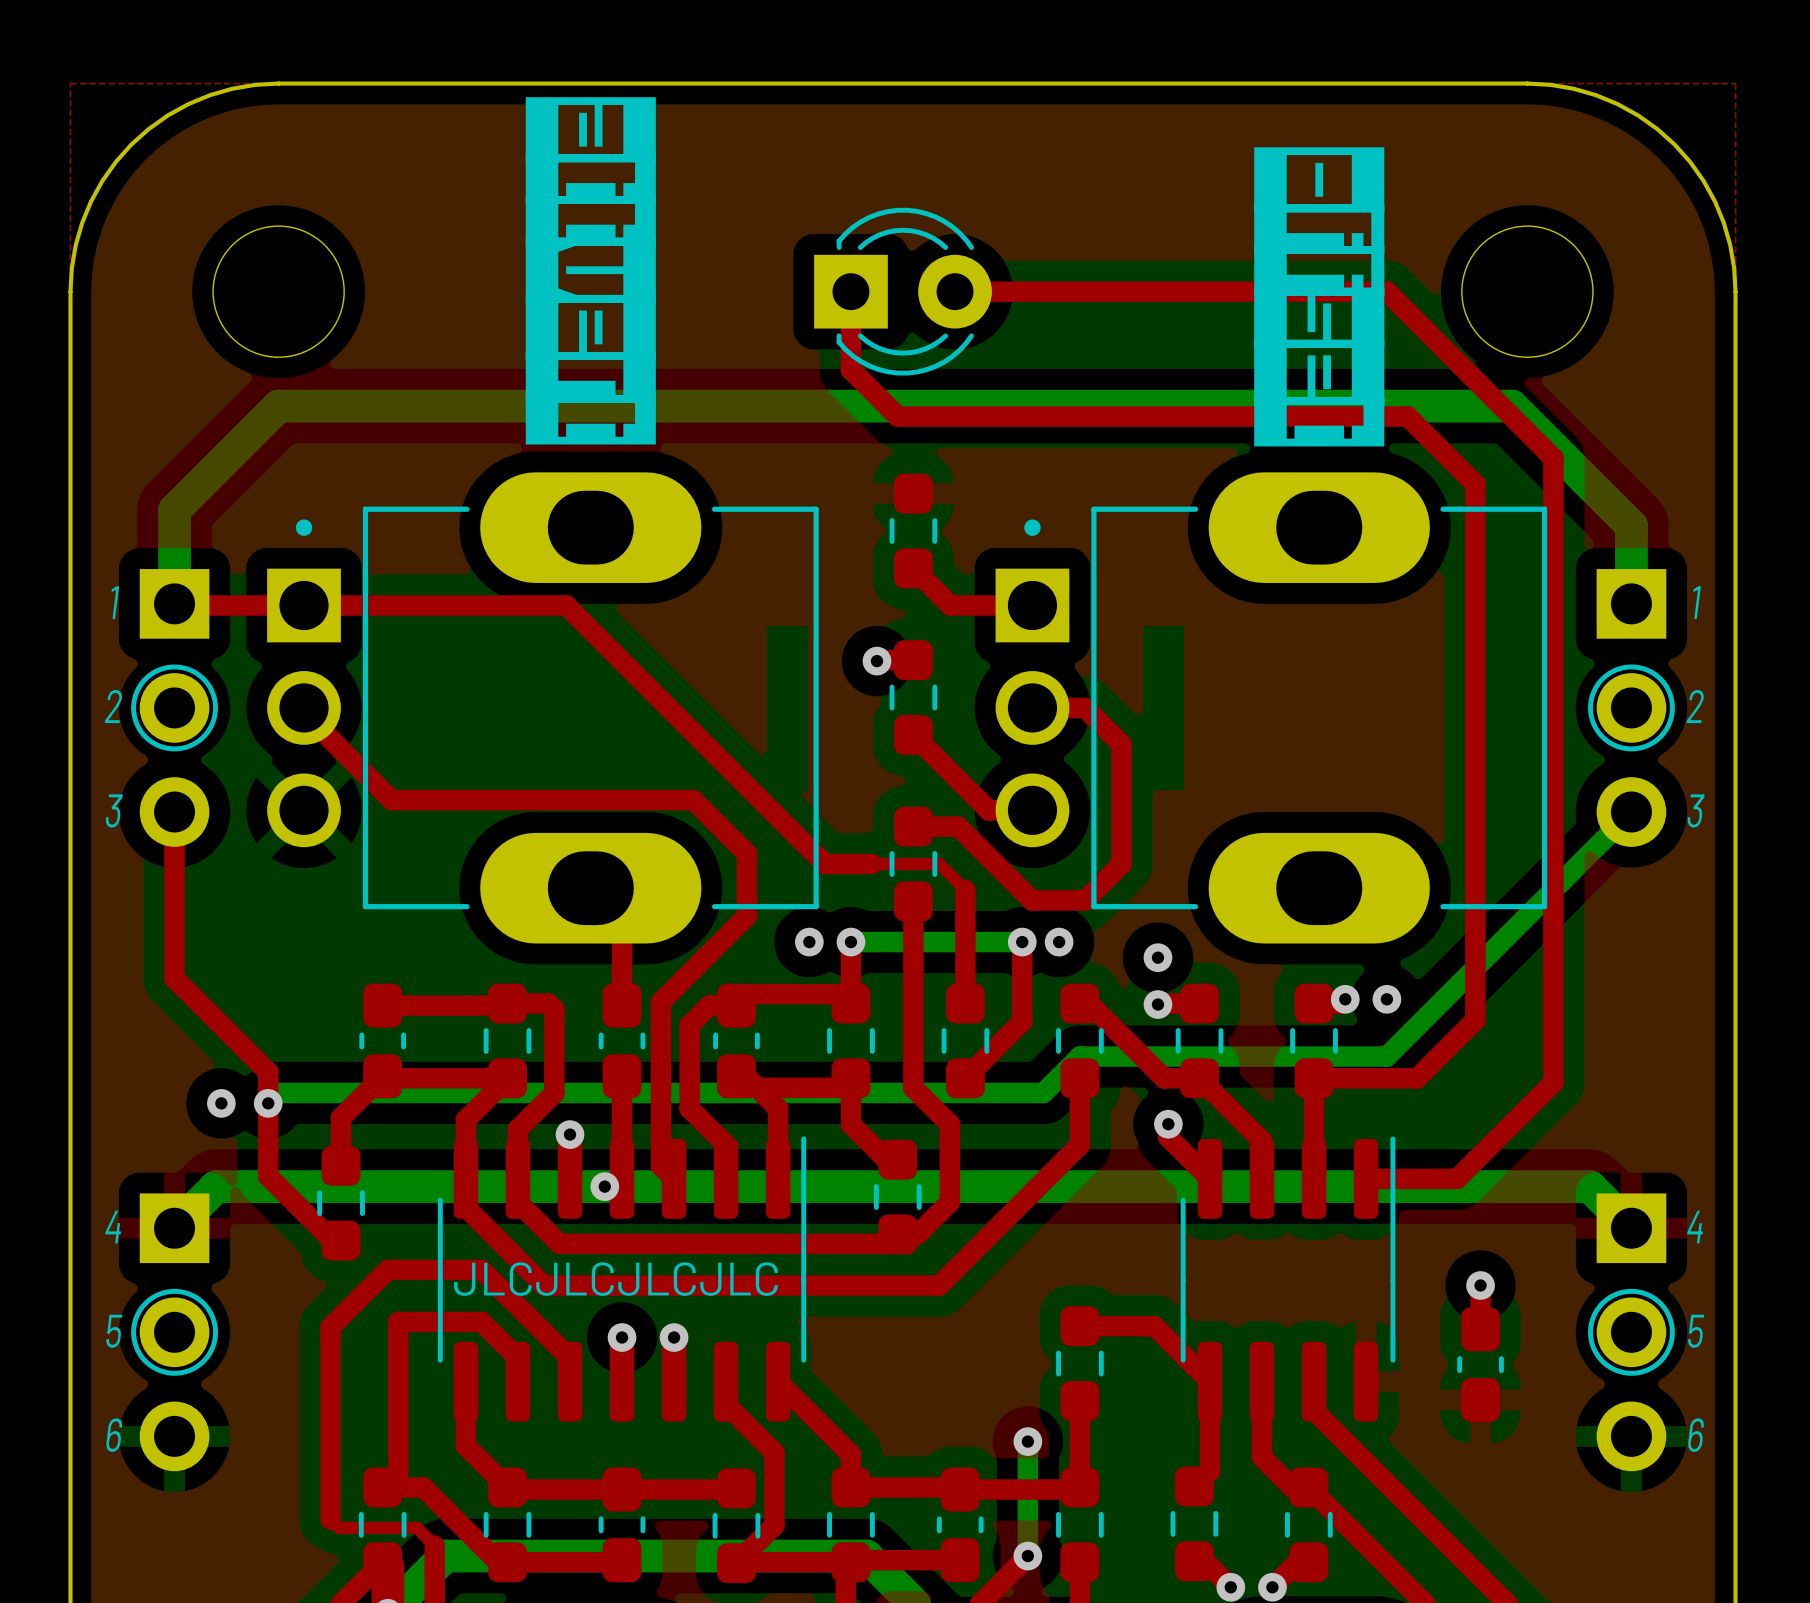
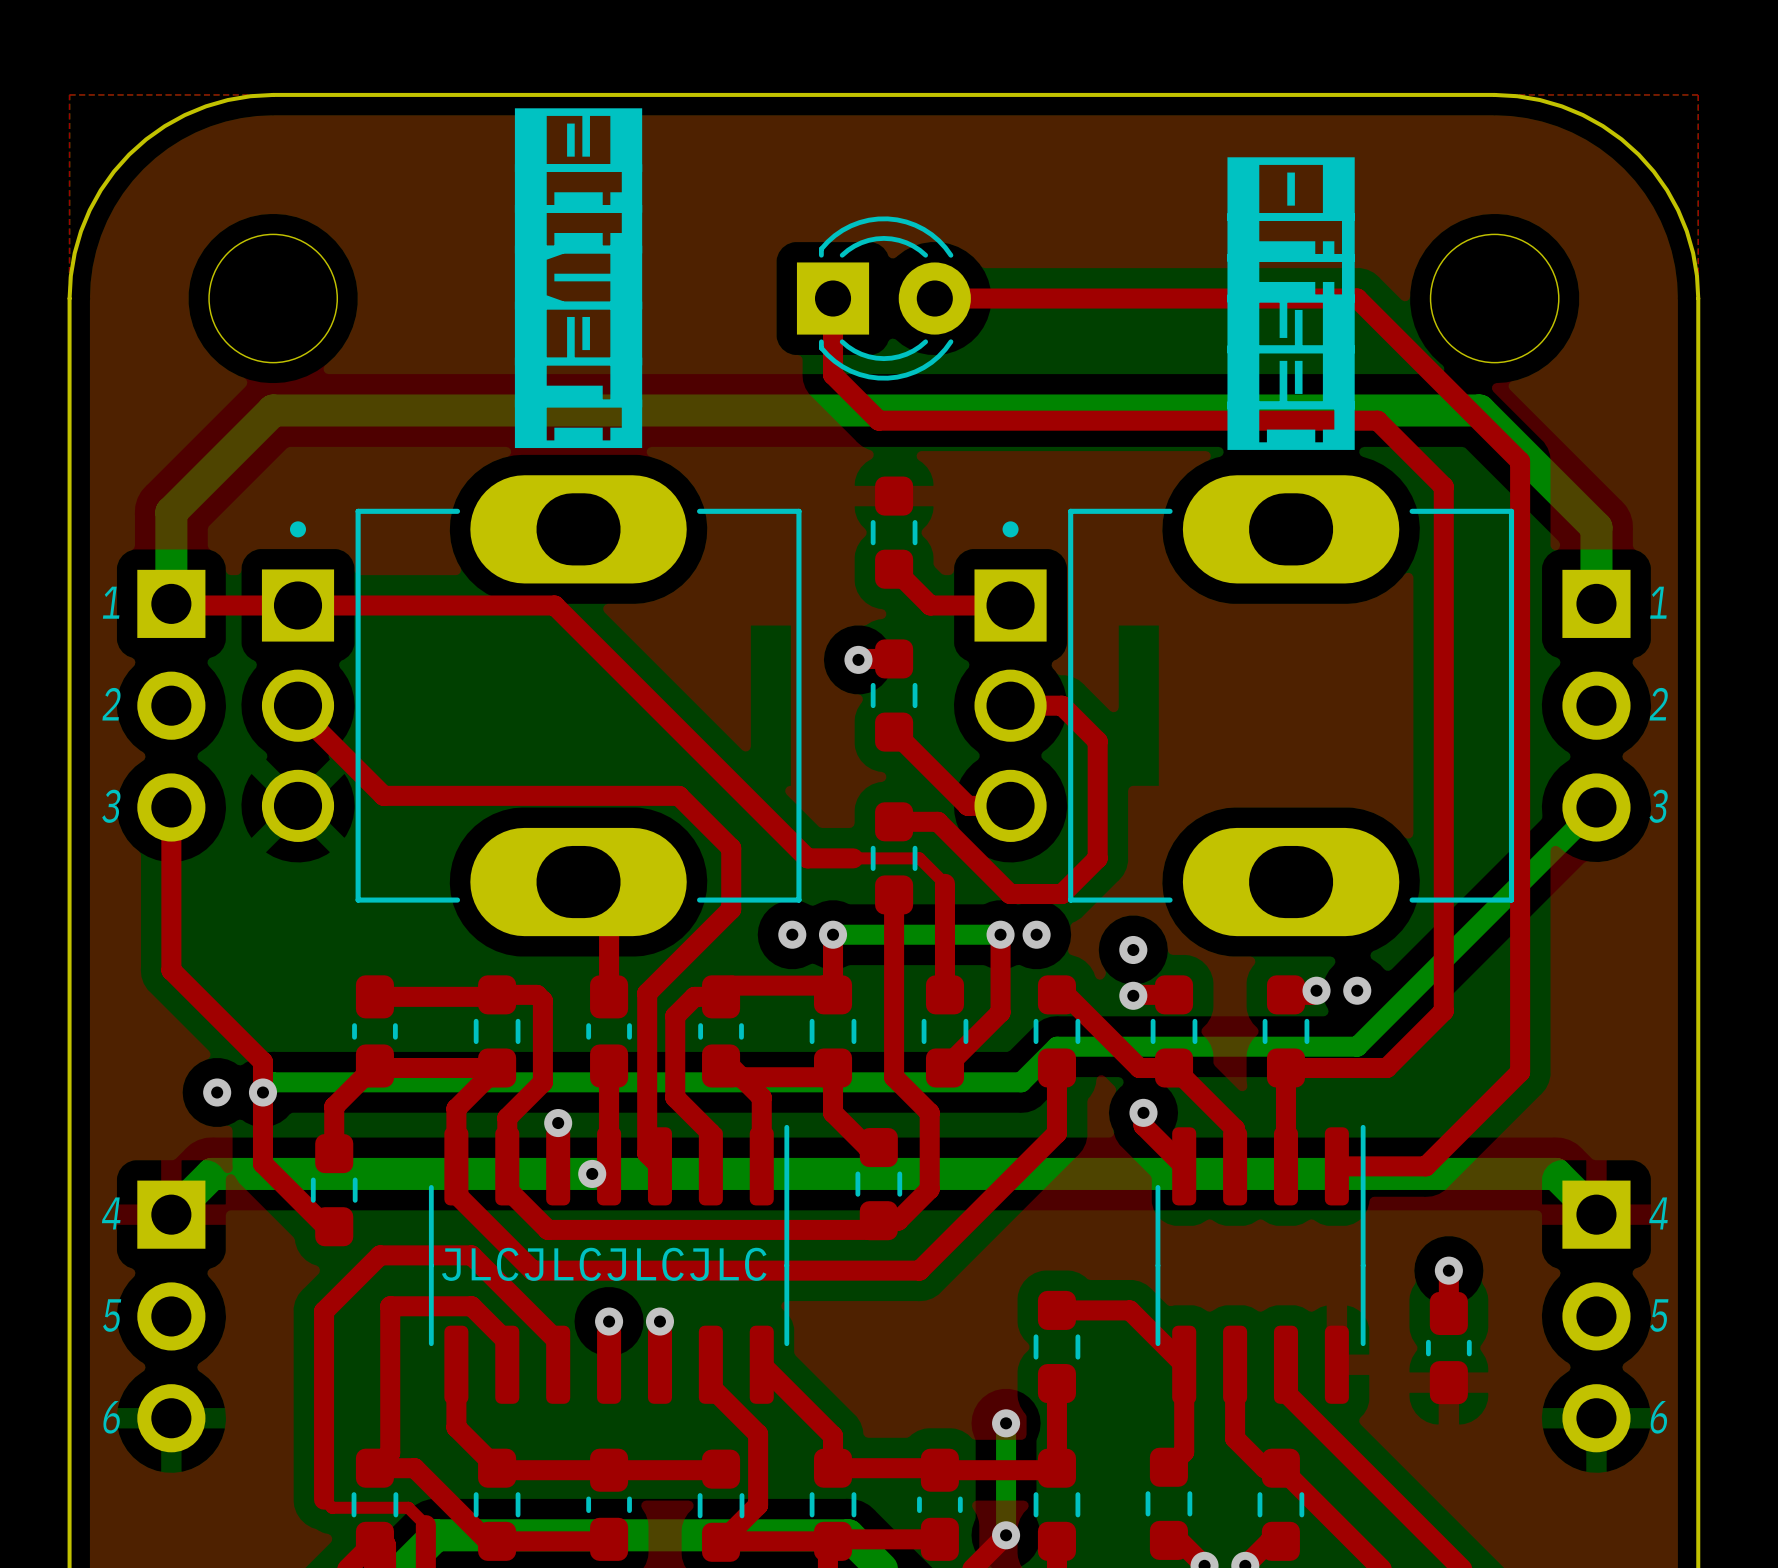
drawing: [131, 664, 218, 752] -> none
drawing: [1588, 664, 1675, 752] -> none
drawing: [131, 1288, 218, 1376] -> none
drawing: [1588, 1288, 1675, 1376] -> none

